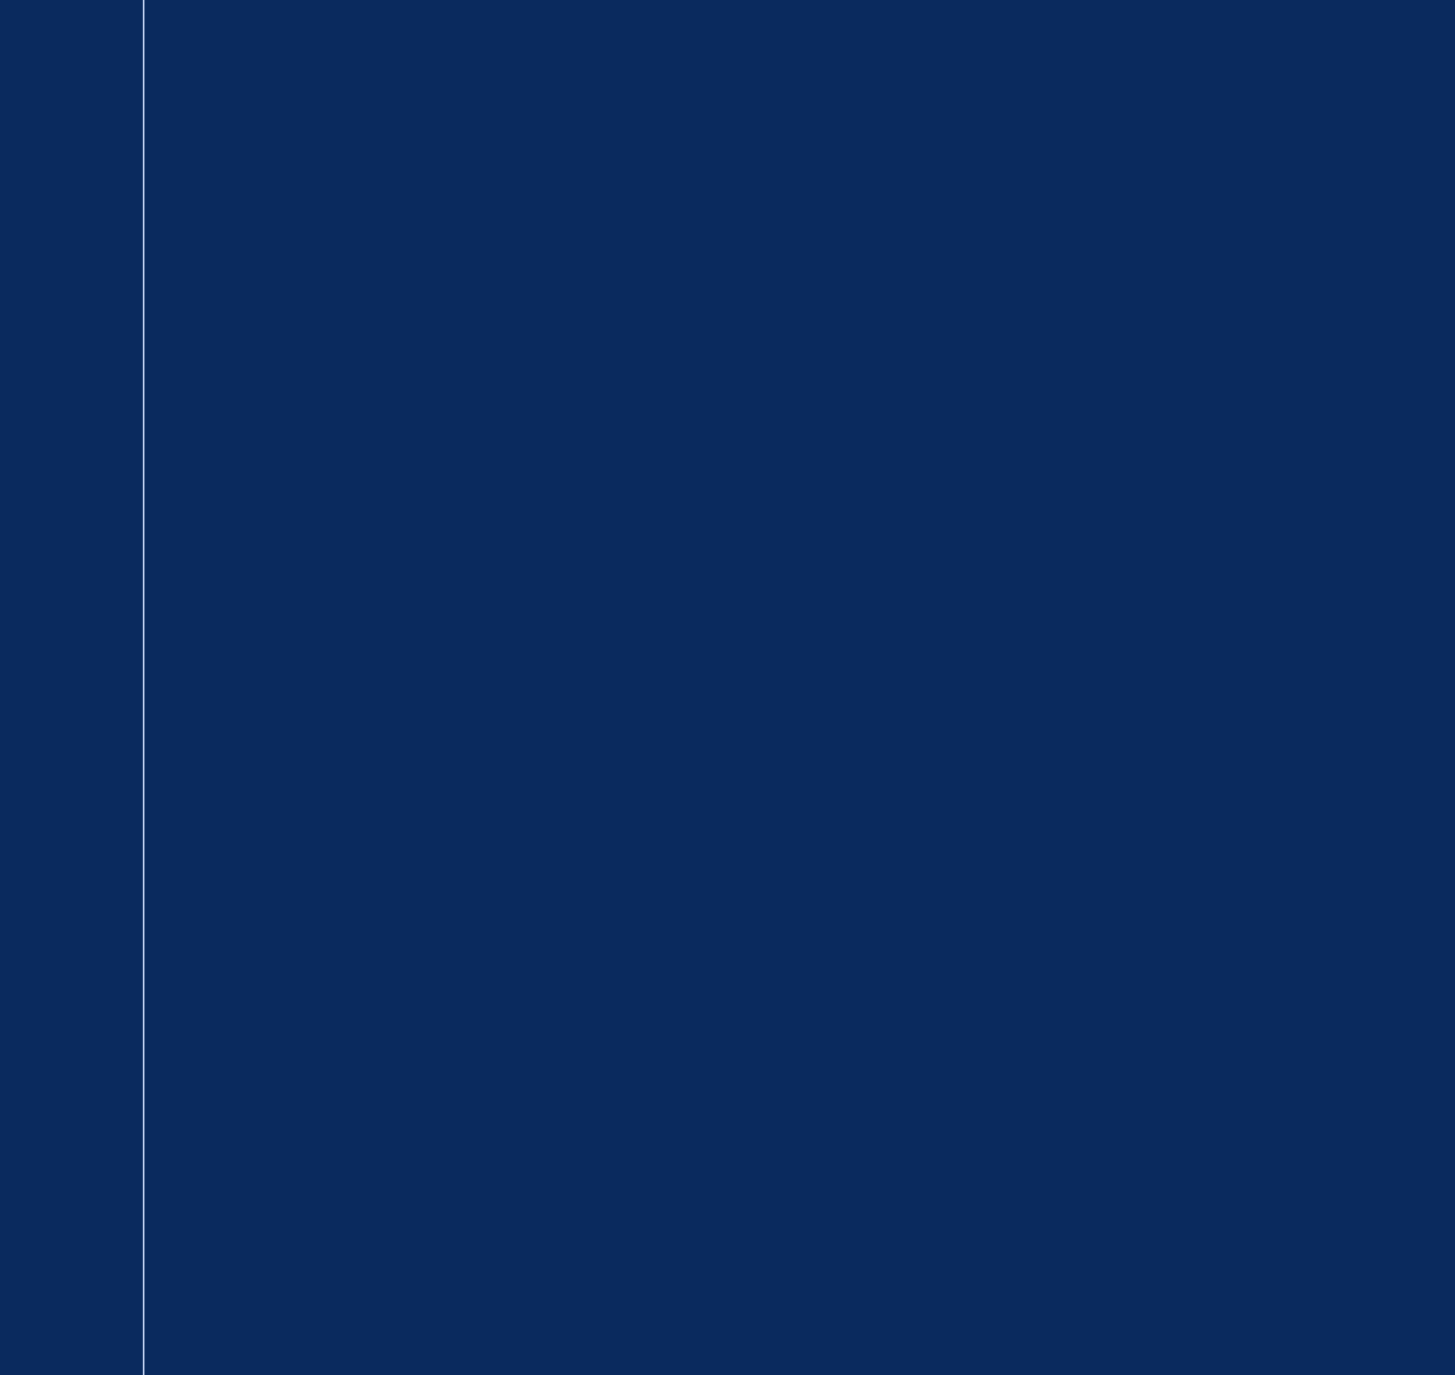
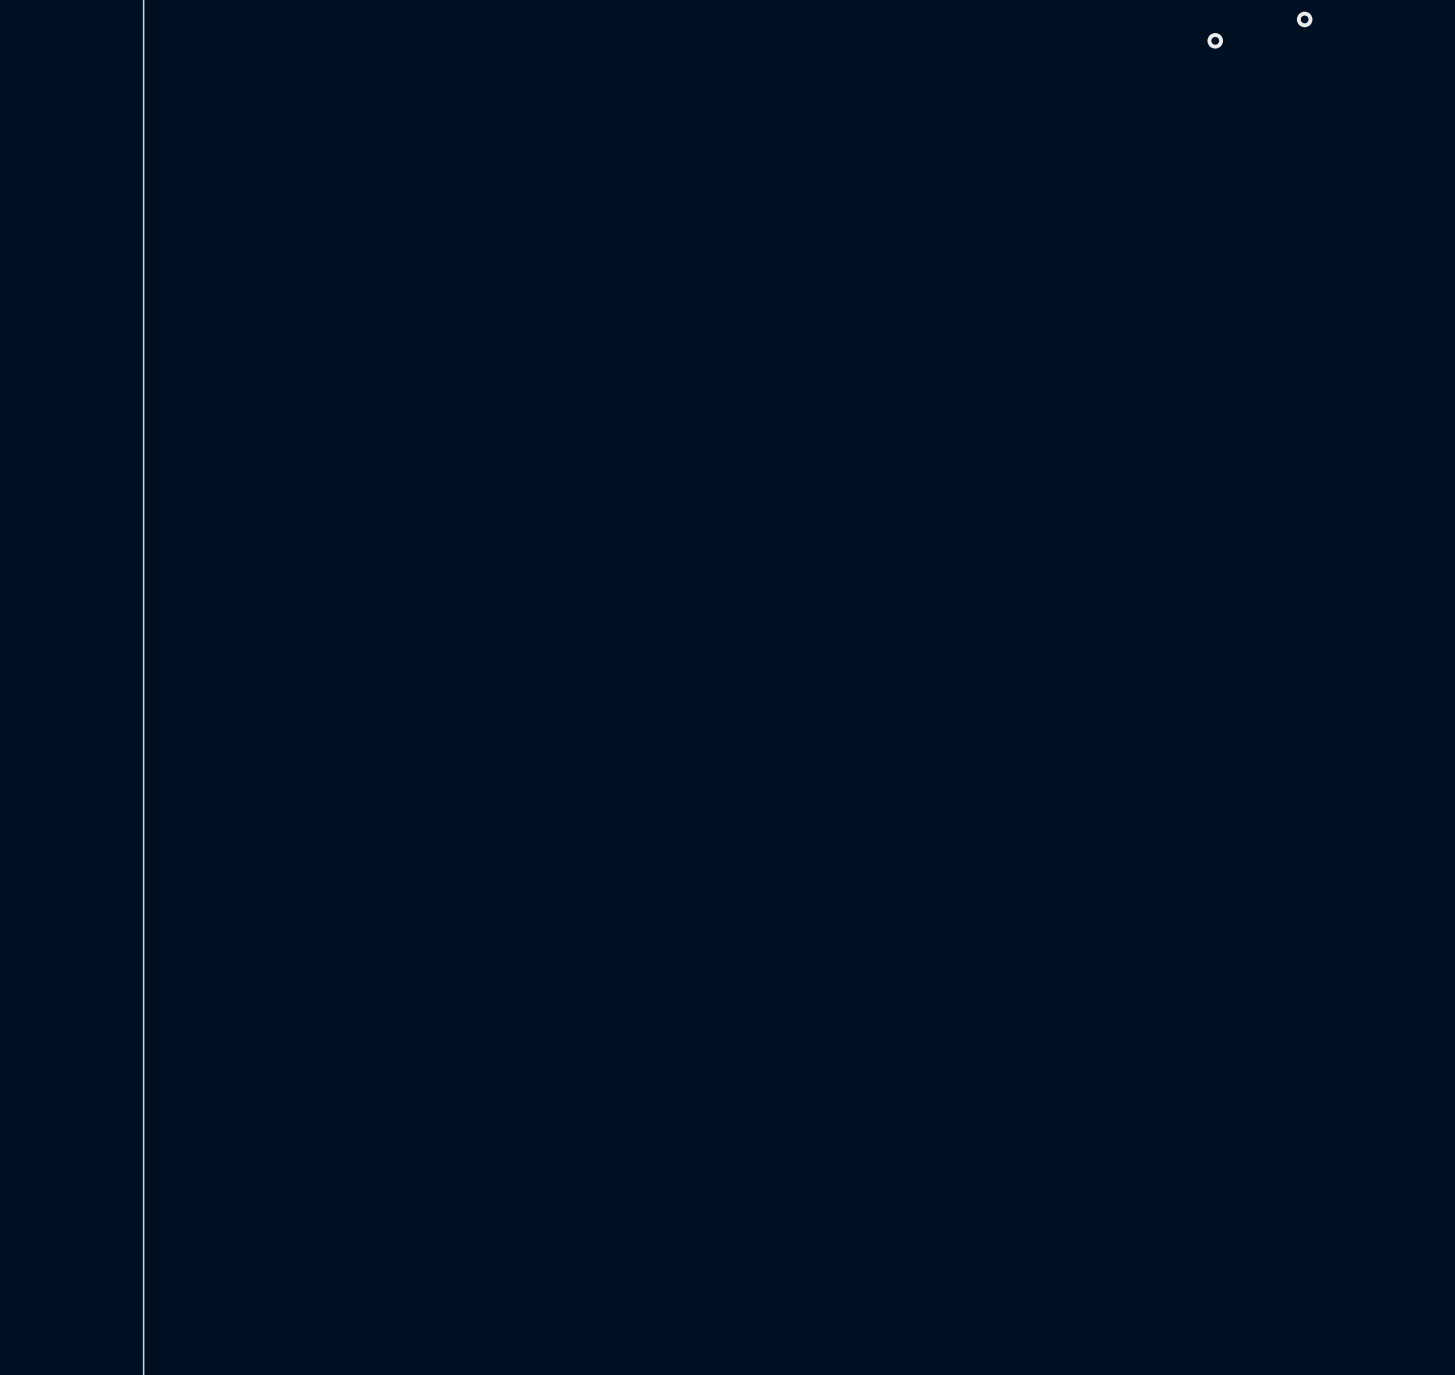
via: none -> (1304, 19)
via: none -> (1215, 40)

